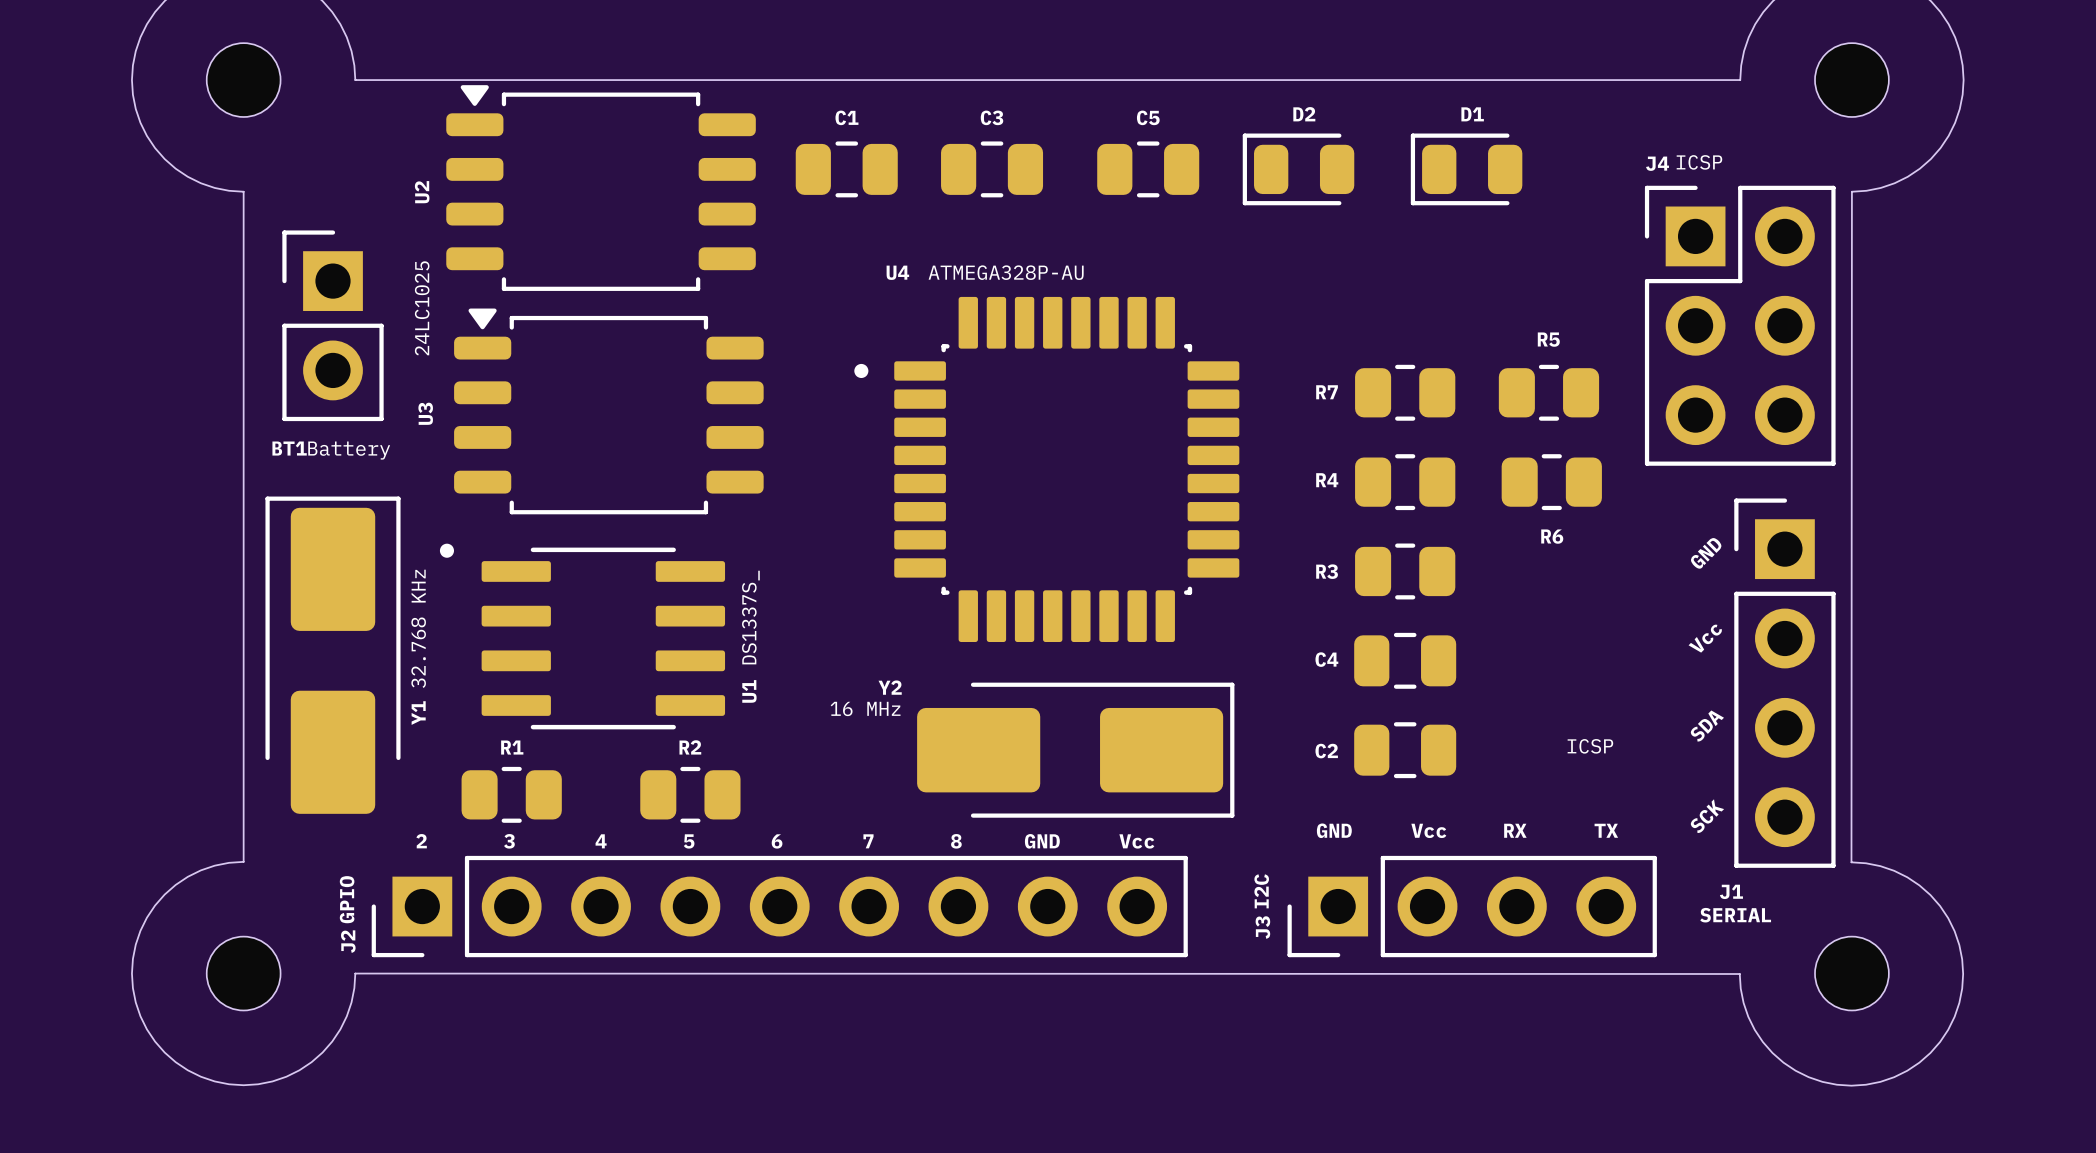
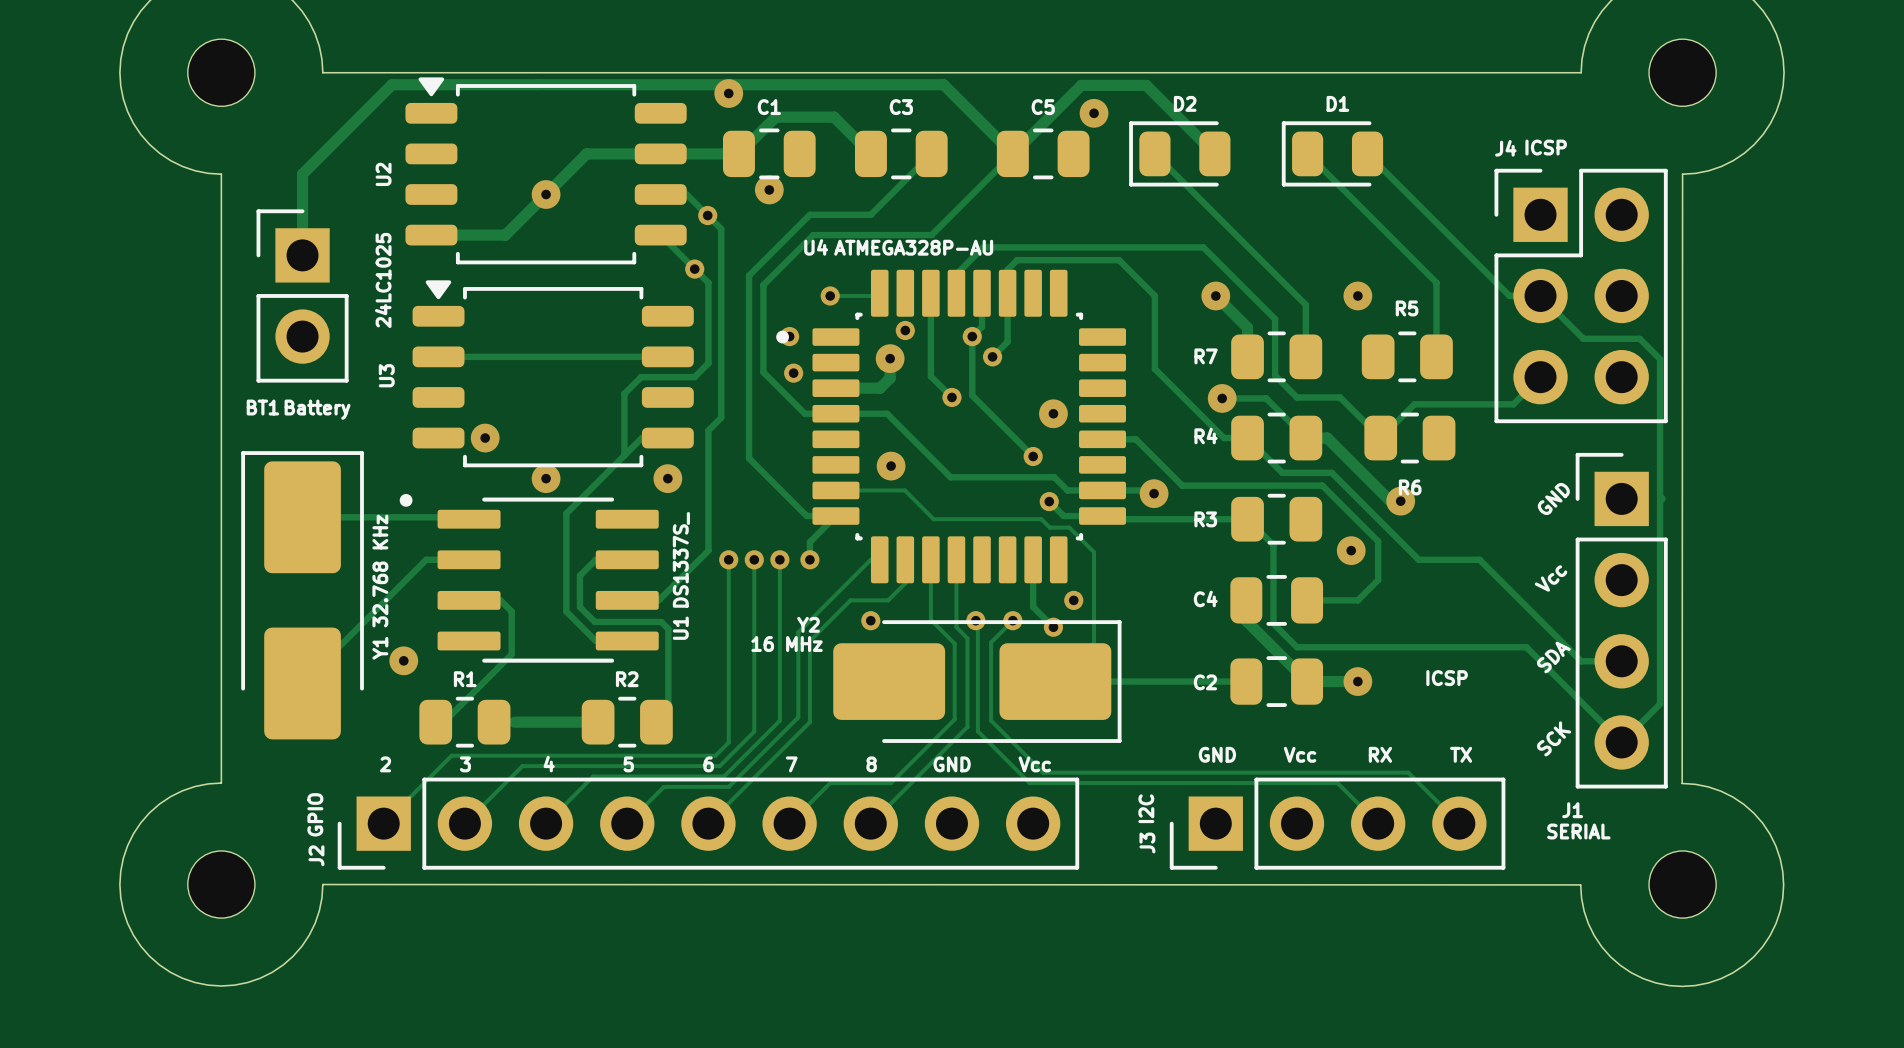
via: none -> (728, 93)
via: none -> (1094, 113)
track: none -> (870, 153) (834, 117) (775, 117) (738, 153) (586, 153) (505, 235) (431, 235)
track: none -> (931, 153) (870, 214) (809, 214) (749, 275) (749, 458) (806, 516) (835, 516) (809, 542) (809, 559)
track: none -> (1012, 153) (931, 235) (813, 235) (763, 285) (763, 372) (804, 413) (887, 413) (950, 477) (1054, 477) (1067, 490) (1146, 490) (1149, 493) (1154, 493)
track: none -> (1012, 153) (943, 84) (392, 84) (302, 174) (302, 255)
track: none -> (1012, 153) (1081, 85) (1146, 85) (1214, 153)
track: none -> (1154, 153) (1305, 304) (1305, 356)
track: none -> (1307, 153) (1436, 282) (1436, 356)
track: none -> (1367, 153) (1509, 295) (1540, 295) (1583, 338) (1639, 338) (1660, 359) (1660, 496) (1662, 498) (1660, 501) (1660, 704) (1621, 742) (1526, 647) (1296, 647) (1273, 623) (1273, 545) (1247, 519) (1105, 519) (1102, 516) (1063, 516) (1049, 501)
via: none -> (769, 189)
via: none -> (546, 194)
track: none -> (660, 194) (686, 194) (721, 229) (721, 417) (708, 430) (708, 550) (658, 600) (627, 600)
via: none -> (707, 215)
track: none -> (660, 235) (708, 282) (708, 363) (694, 377) (641, 377) (624, 393) (624, 455)
via: none -> (694, 269)
track: none -> (879, 293) (877, 295) (830, 295)
track: none -> (930, 293) (930, 376) (951, 397)
track: none -> (956, 293) (956, 274) (983, 247) (1203, 247) (1275, 319) (1275, 375) (1296, 397) (1340, 397) (1380, 438) (1414, 404) (1513, 404) (1540, 377)
track: none -> (982, 293) (982, 326) (972, 336) (972, 395) (1033, 456)
via: none -> (830, 295)
track: none -> (1215, 295) (1247, 327) (1247, 356)
via: none -> (1215, 295)
via: none -> (1357, 295)
via: none -> (905, 330)
via: none -> (789, 336)
via: none -> (972, 336)
track: none -> (438, 356) (667, 356)
track: none -> (992, 356) (1007, 341) (1007, 269) (1017, 260) (1119, 260) (1154, 295) (1154, 369) (1223, 438) (1247, 438) (1282, 472) (1331, 472) (1418, 559) (1479, 559) (1581, 661) (1621, 661)
via: none -> (992, 356)
track: none -> (890, 358) (890, 378) (880, 388) (835, 388)
via: none -> (890, 358)
via: none -> (793, 373)
via: none -> (951, 397)
track: none -> (1222, 398) (1266, 398) (1305, 438) (1327, 438) (1390, 501) (1400, 501)
via: none -> (1222, 398)
via: none -> (1053, 413)
via: none -> (485, 438)
track: none -> (667, 438) (641, 438) (566, 513) (566, 611) (595, 640) (627, 640)
track: none -> (1102, 439) (1135, 439) (1182, 485) (1322, 485) (1378, 541) (1378, 580) (1357, 600) (1307, 600)
via: none -> (1033, 456)
via: none -> (891, 466)
via: none -> (546, 478)
via: none -> (667, 478)
track: none -> (835, 490) (904, 490) (933, 519) (1041, 519) (1049, 527) (1069, 527) (1094, 552) (1094, 642) (1055, 681) (1246, 681)
via: none -> (1154, 493)
via: none -> (1400, 501)
via: none -> (1049, 501)
track: none -> (302, 517) (467, 517) (469, 519)
via: none -> (1351, 550)
track: none -> (469, 559) (426, 559) (302, 683)
track: none -> (627, 559) (595, 559) (579, 575) (579, 607) (594, 621) (661, 621) (668, 628) (668, 710) (656, 722)
track: none -> (728, 559) (728, 742) (715, 755) (451, 755) (383, 823)
via: none -> (728, 559)
track: none -> (754, 559) (754, 731) (719, 766) (522, 766) (464, 823)
via: none -> (754, 559)
track: none -> (779, 559) (779, 720) (724, 776) (593, 776) (546, 823)
via: none -> (779, 559)
via: none -> (809, 559)
track: none -> (879, 559) (870, 559) (798, 632) (798, 717) (728, 786) (664, 786) (627, 823) (627, 803)
track: none -> (905, 559) (905, 583) (888, 600) (850, 600) (809, 640) (809, 722) (708, 823)
track: none -> (930, 559) (930, 619) (954, 643) (954, 719) (891, 783) (830, 783) (789, 823)
track: none -> (956, 559) (956, 627) (967, 638) (967, 726) (870, 823)
track: none -> (1033, 559) (1033, 606) (1053, 627)
track: none -> (469, 600) (500, 600) (511, 611) (511, 654) (443, 722) (435, 722)
via: none -> (1073, 600)
track: none -> (1246, 600) (1246, 620) (1307, 681) (1357, 681)
via: none -> (870, 620)
track: none -> (975, 620) (977, 622) (977, 731) (1029, 783) (1337, 783) (1378, 823)
via: none -> (975, 620)
track: none -> (1012, 620) (991, 642) (991, 720) (1043, 772) (1408, 772) (1459, 823)
via: none -> (1012, 620)
via: none -> (1053, 627)
via: none -> (403, 660)
via: none -> (1357, 681)
track: none -> (514, 722) (586, 722)

